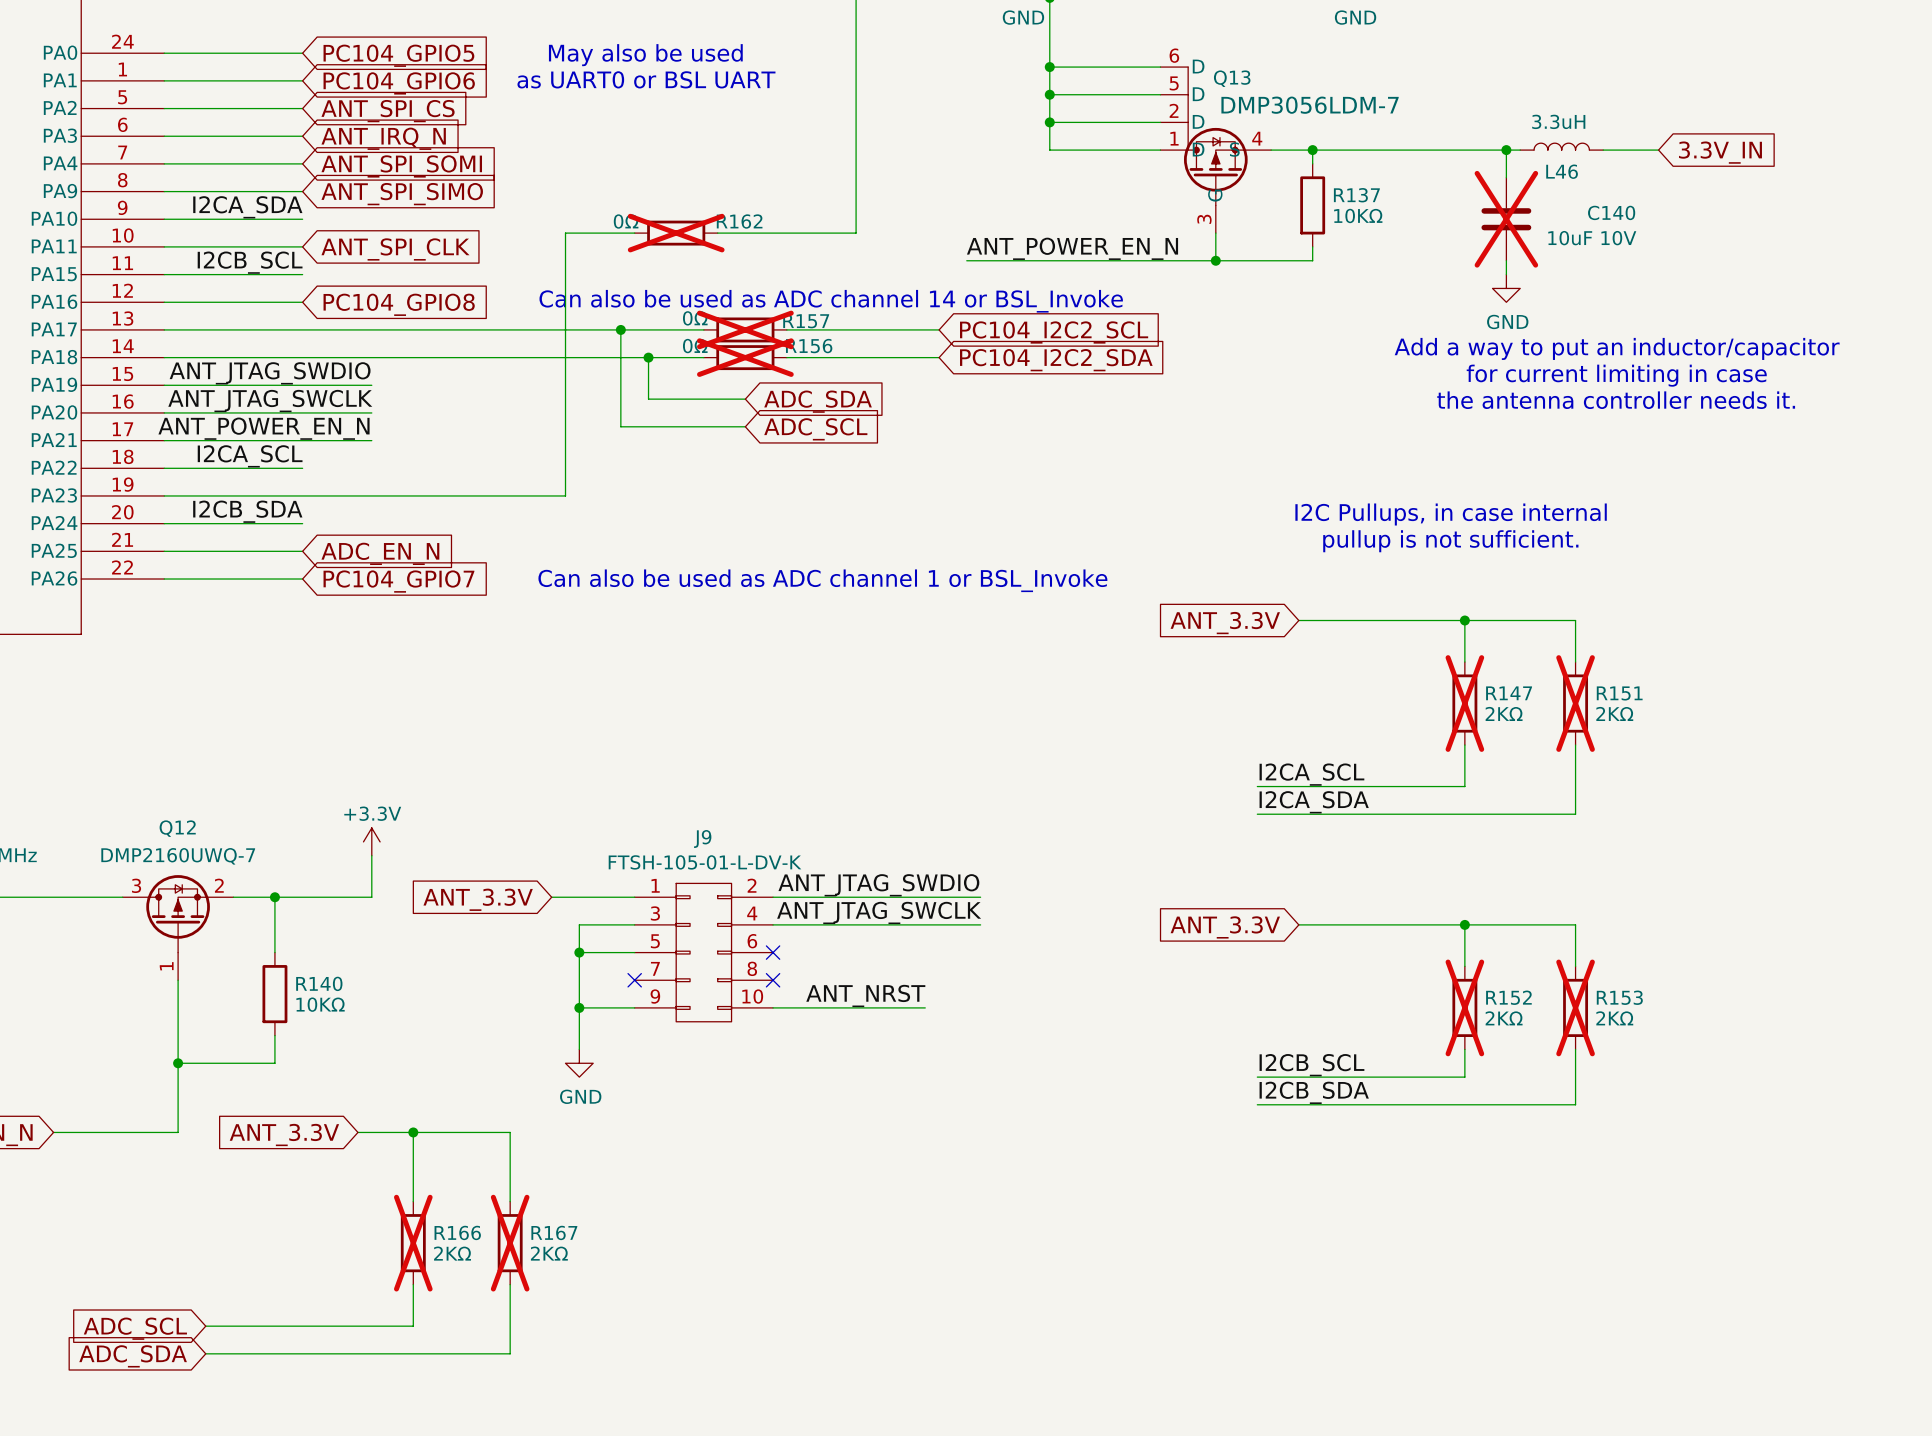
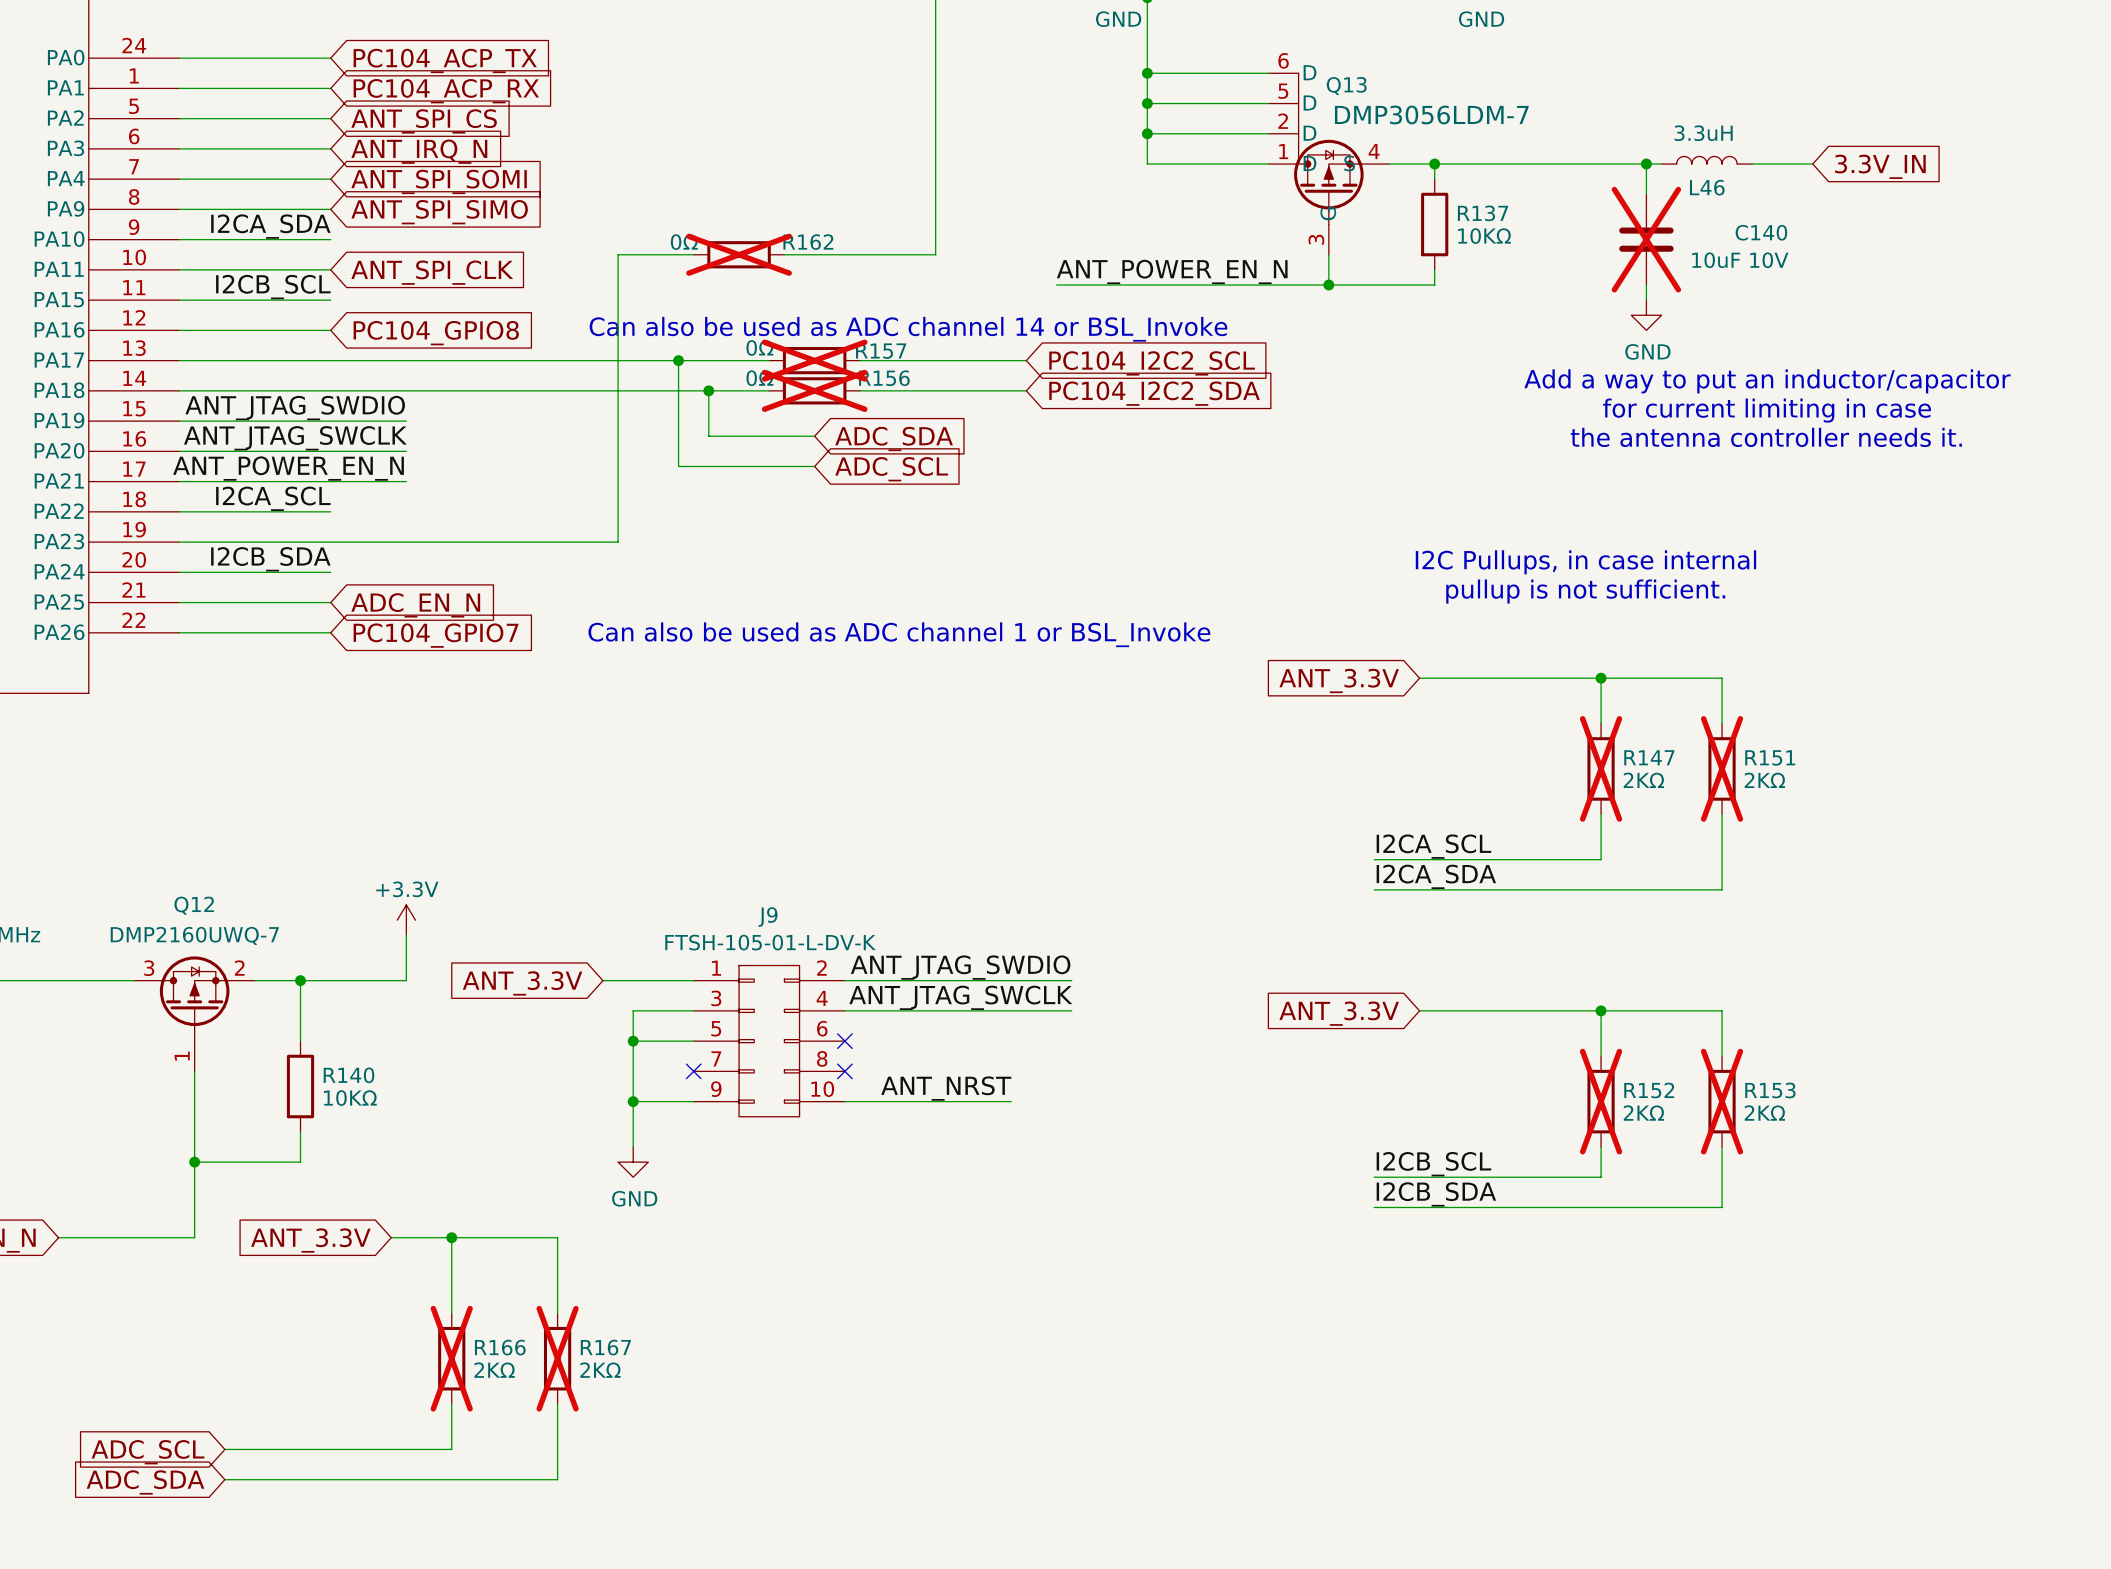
global label: PC104_GPIO5 (398, 55) -> PC104_ACP_TX (445, 60)
text: May also be used (645, 55) -> none
text: as UART0 or BSL UART (646, 79) -> none
global label: PC104_GPIO6 (399, 83) -> PC104_ACP_RX (446, 91)

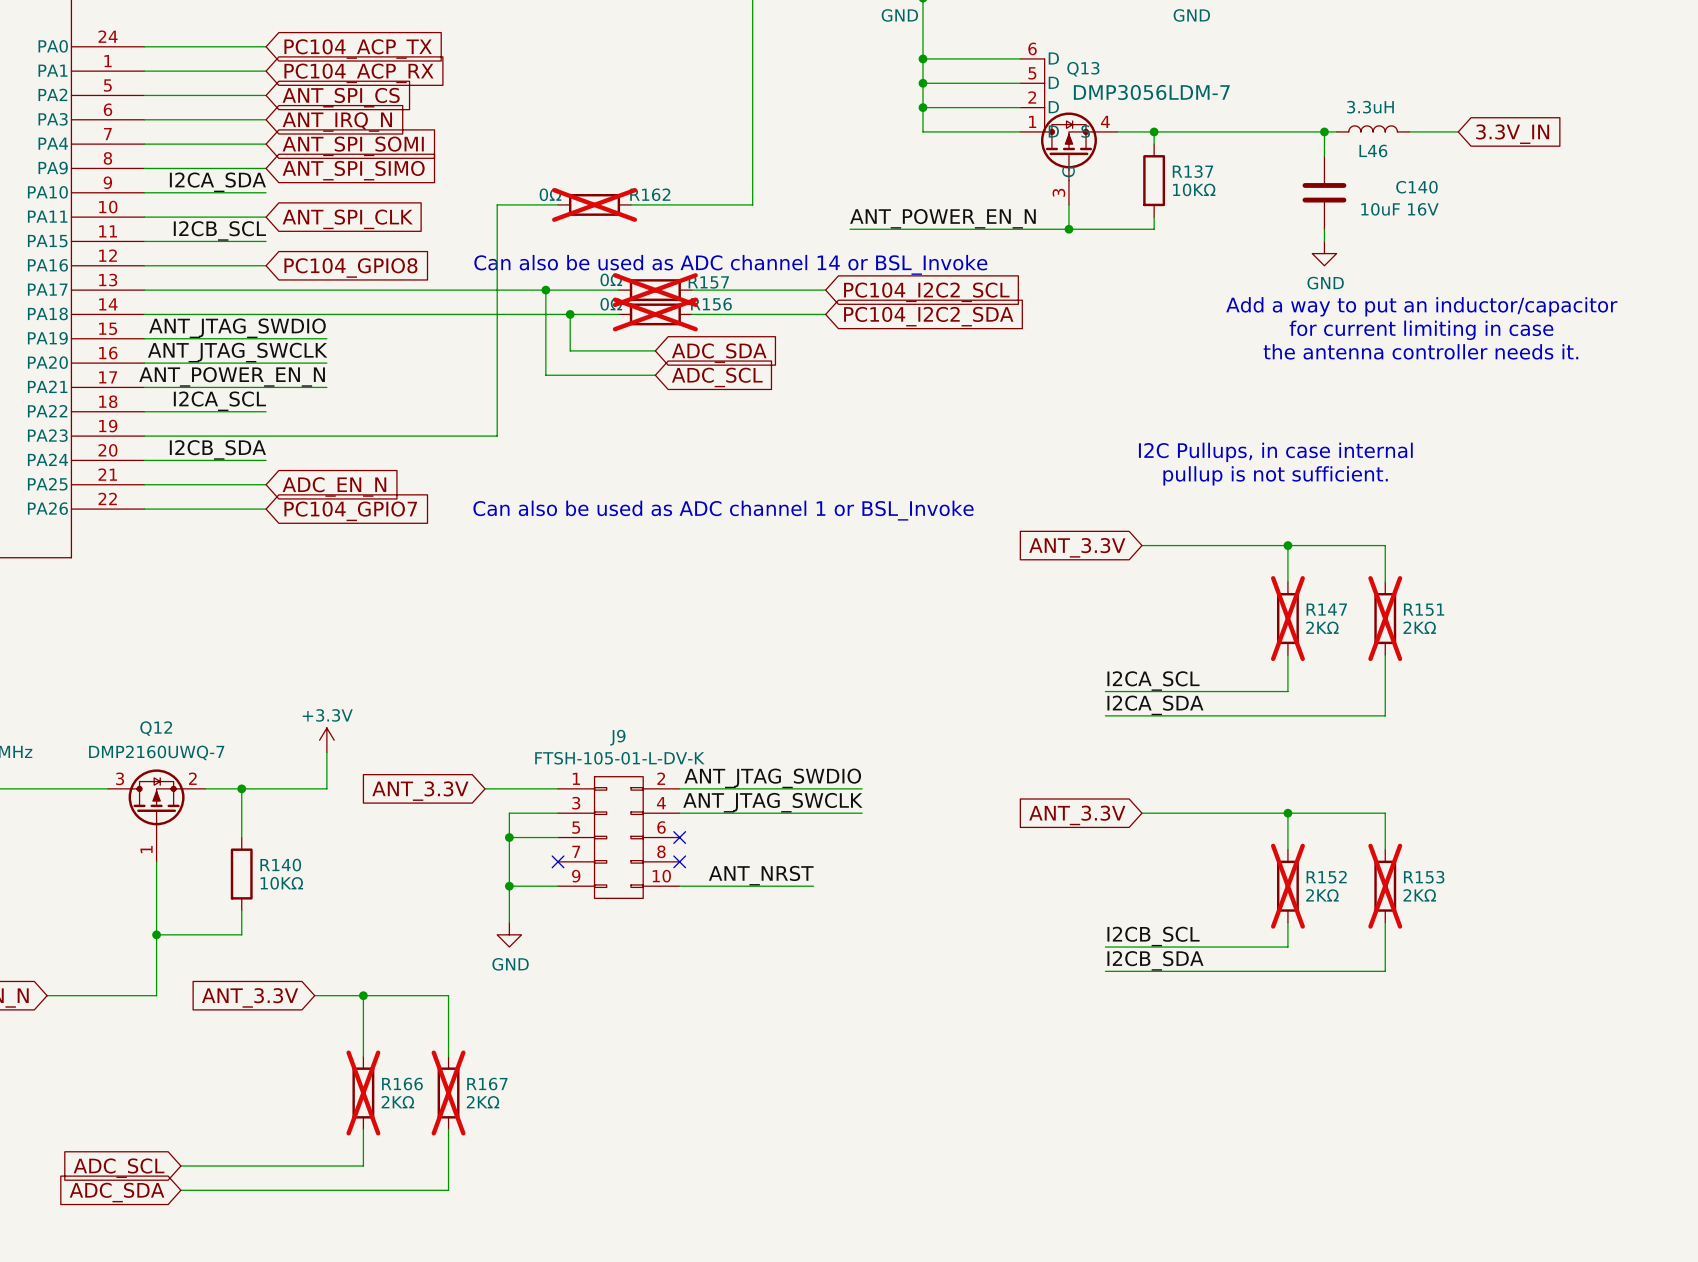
C140 do-not-place cross: (1646, 239) -> none
C140 value: 10uF 10V (1740, 260) -> 10uF 16V (1399, 209)

